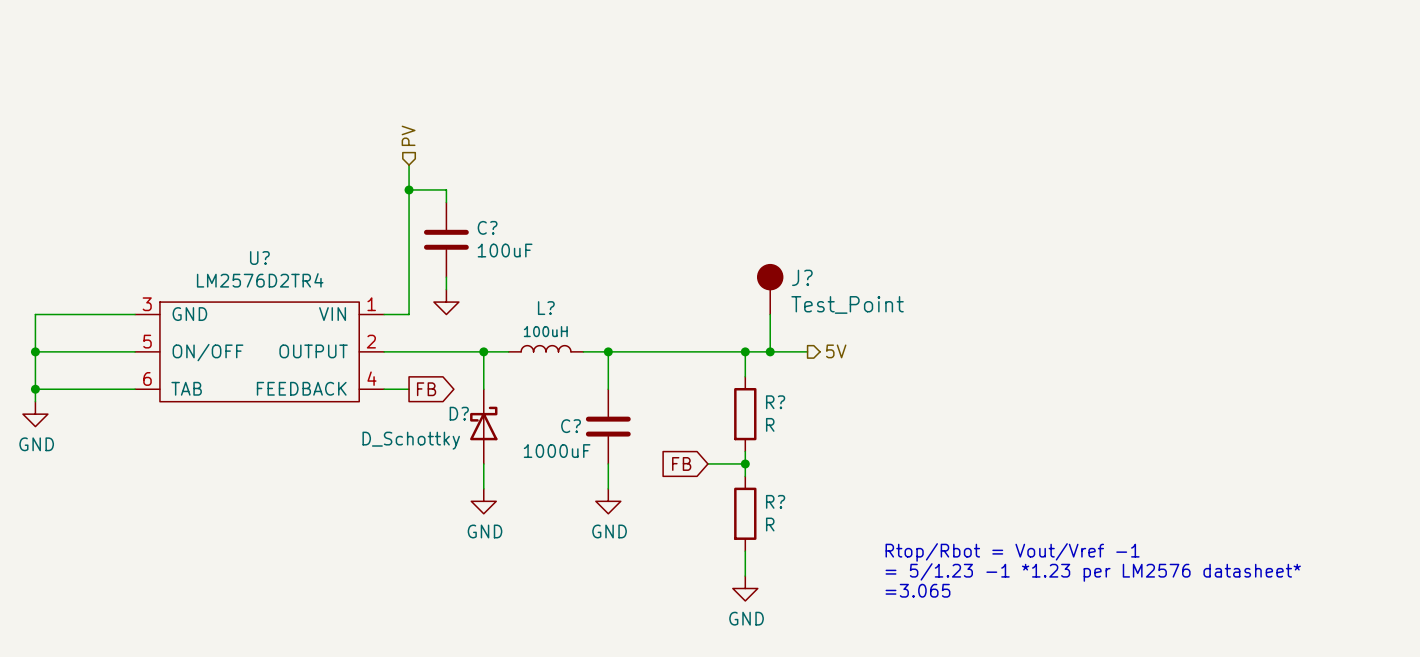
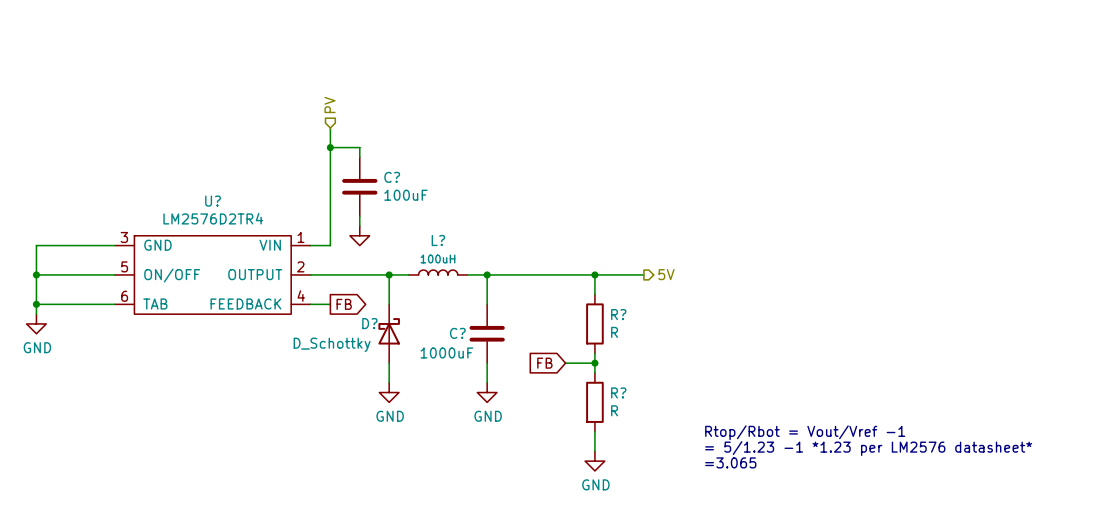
J?: Test_Point (770, 289) -> none
wire: (770, 314) (770, 351) -> none
junction: (770, 351) -> none

